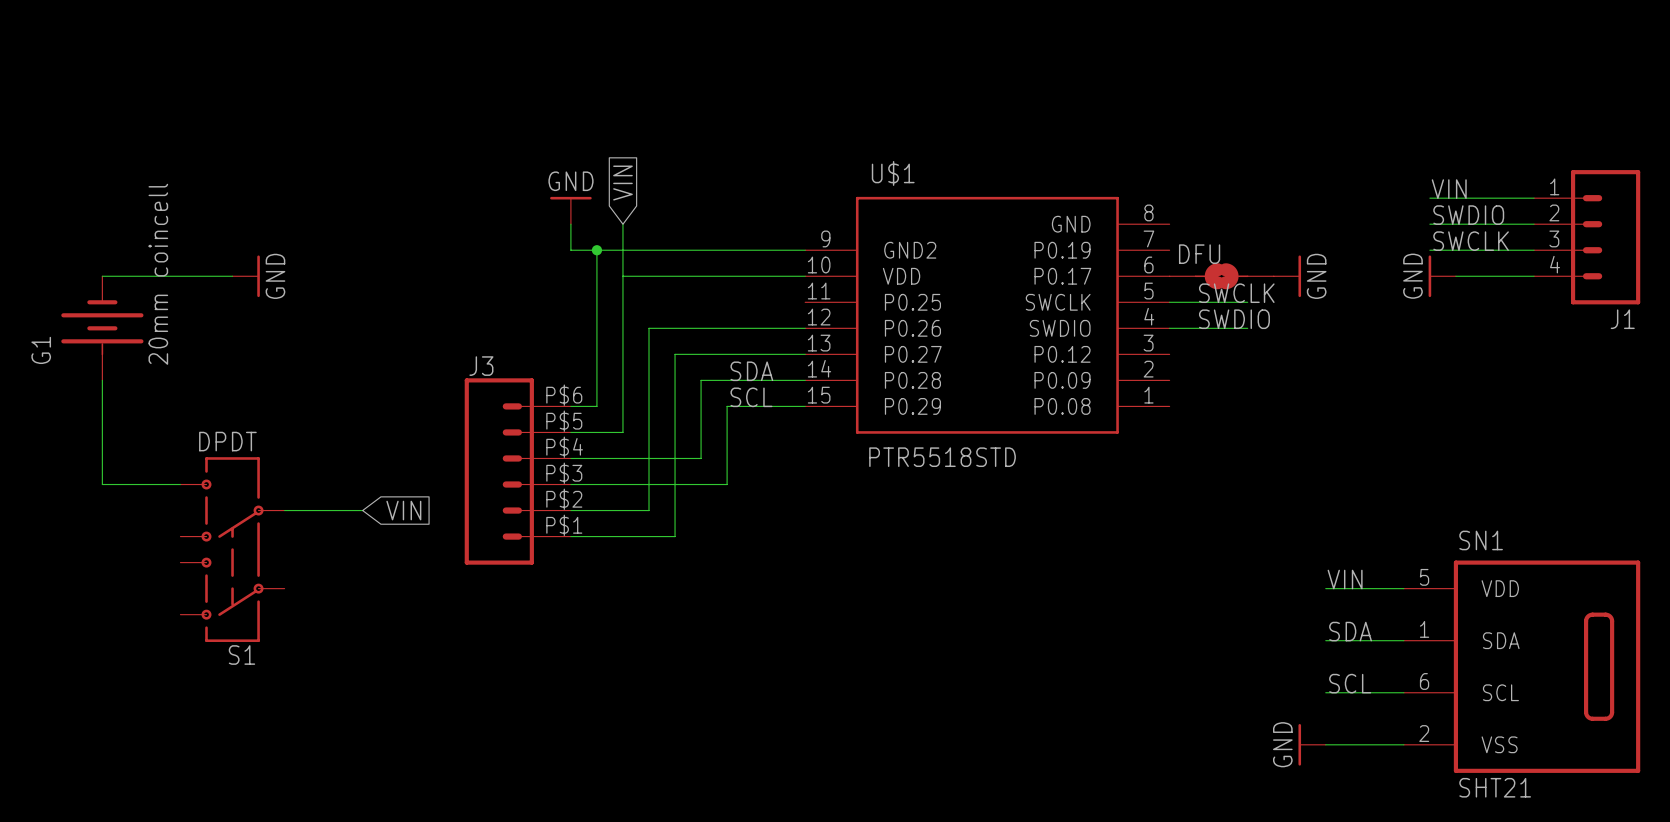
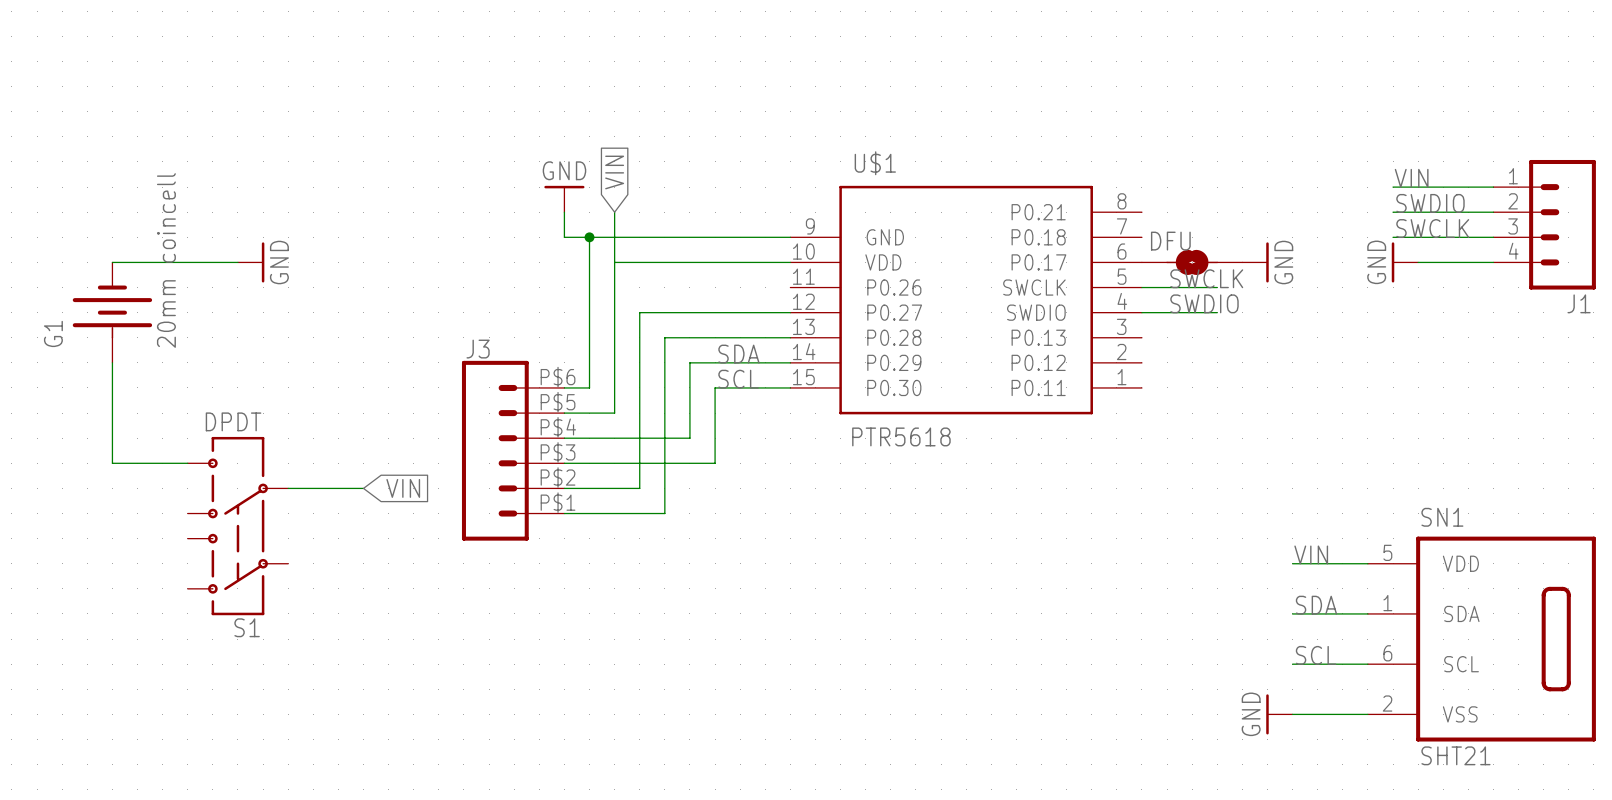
U$1 symbol: [805, 196, 1170, 434] -> [790, 185, 1142, 415]
U$1 value: PTR5518STD (942, 457) -> PTR5618 (901, 436)

